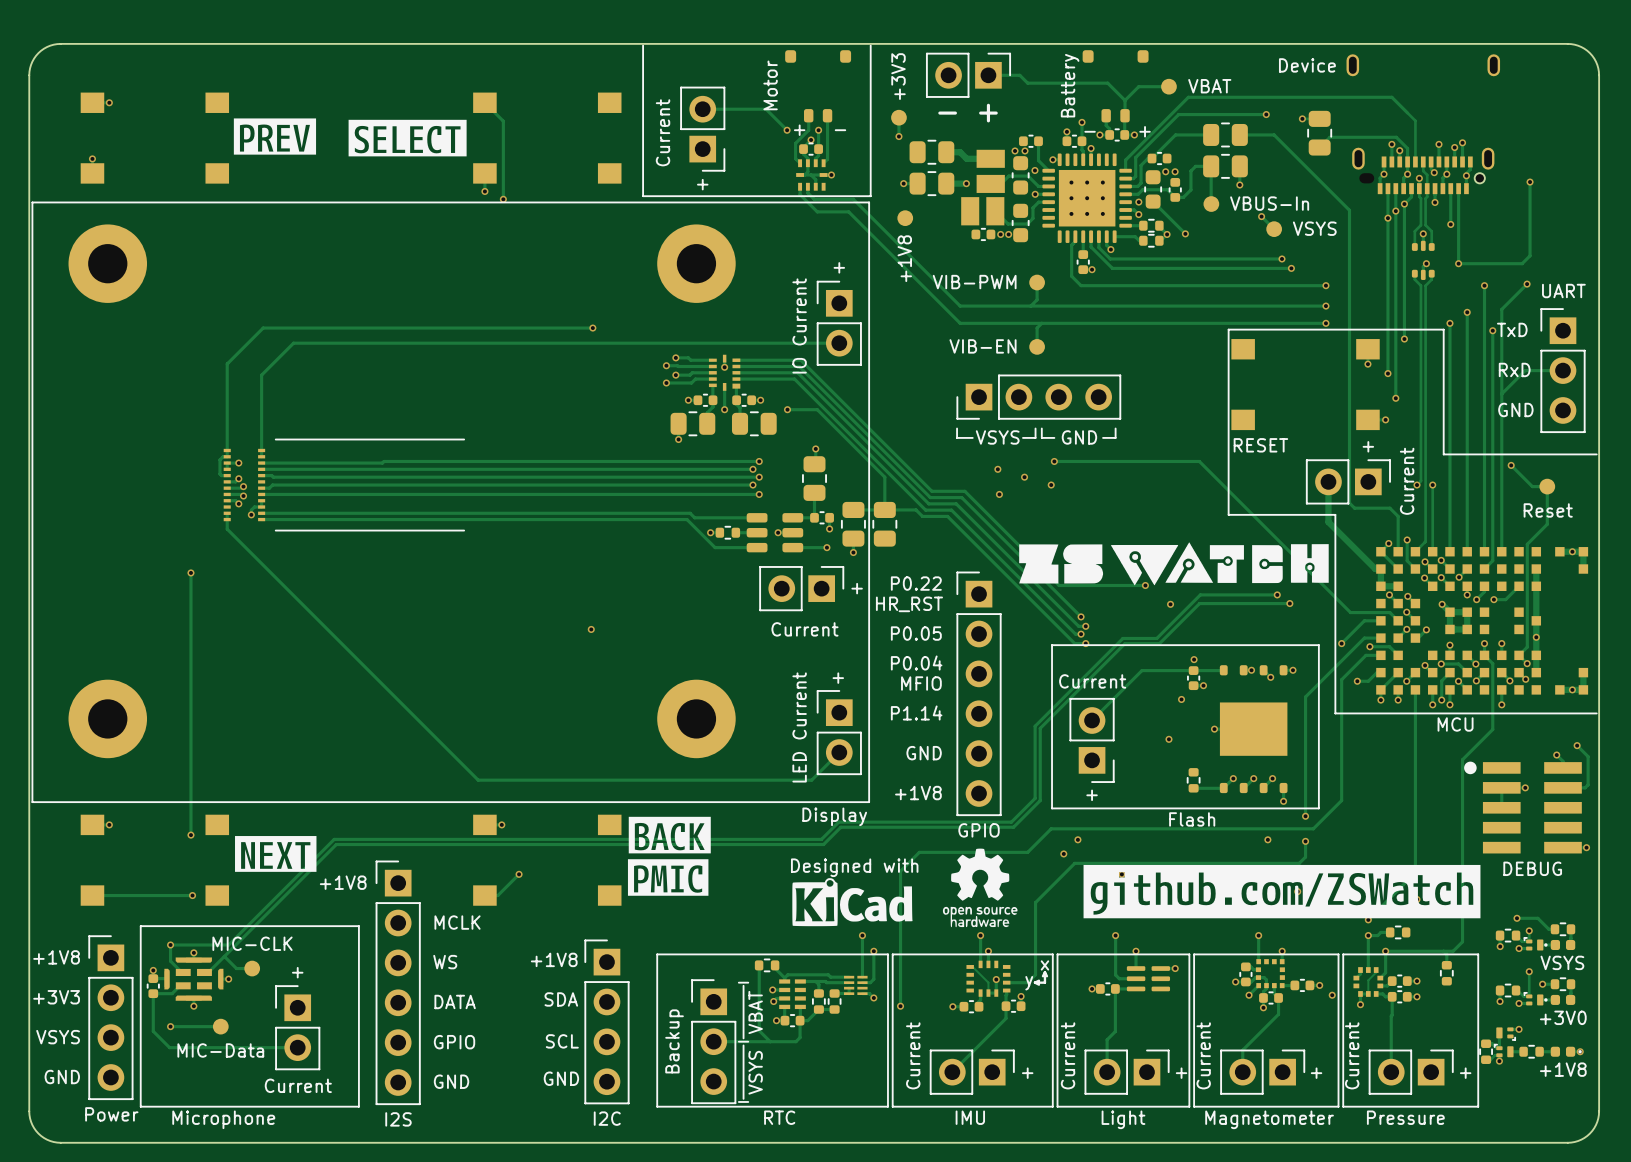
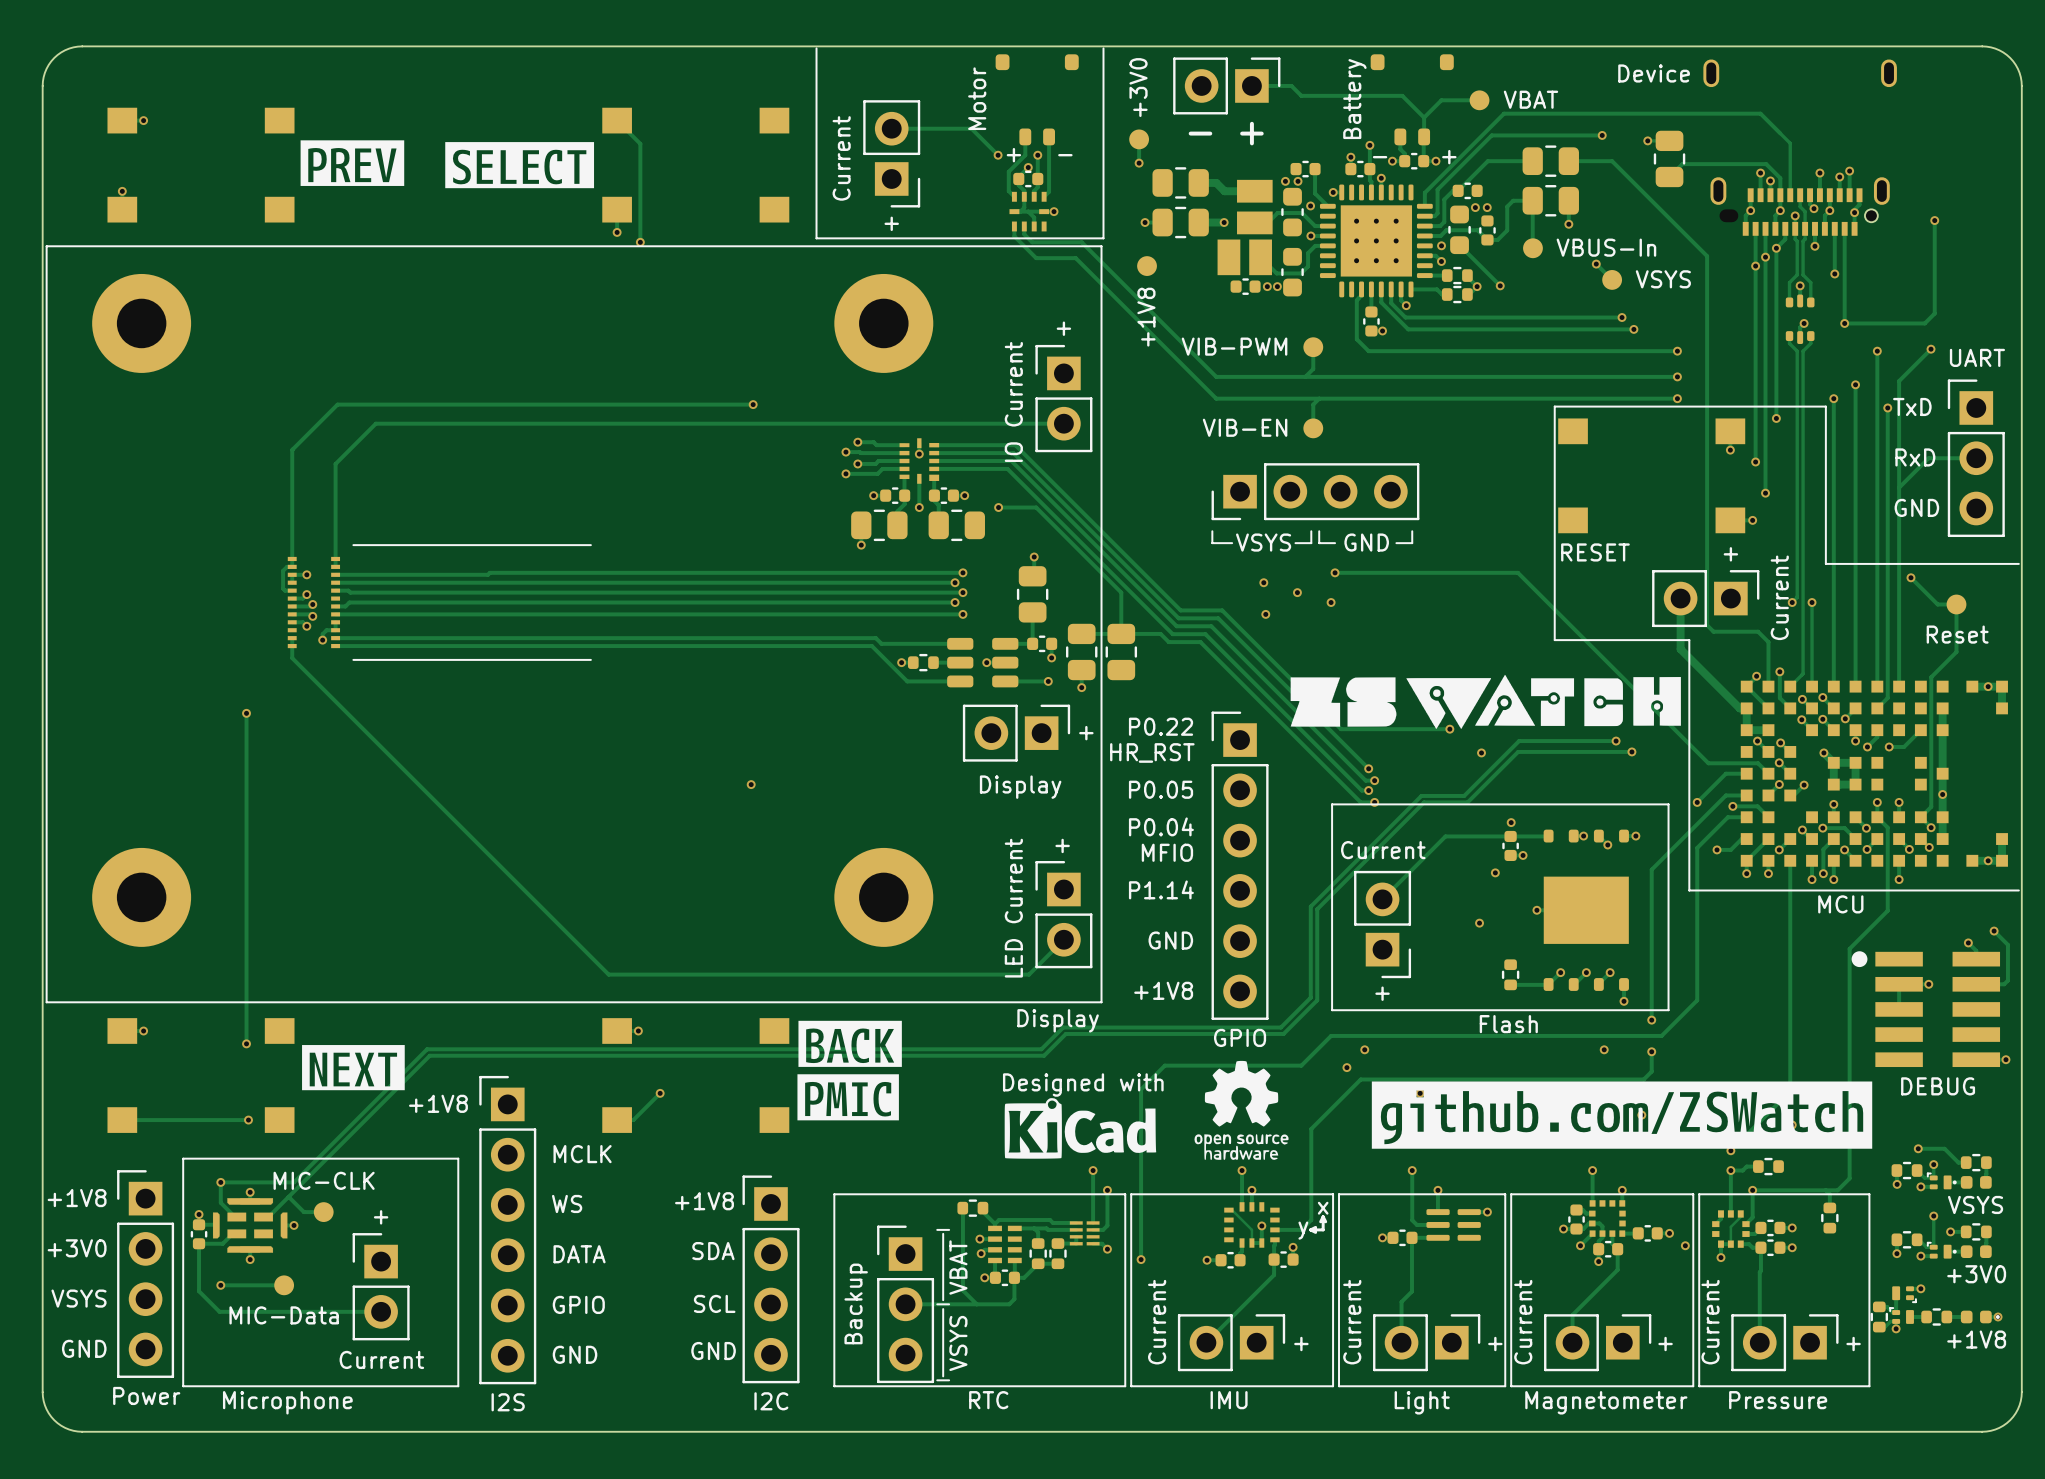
part value: +3V3 (898, 76) -> +3V0 (1138, 87)
part value: Current (804, 629) -> Display (1020, 787)
text: +3V3 (56, 997) -> +3V0 (77, 1248)

